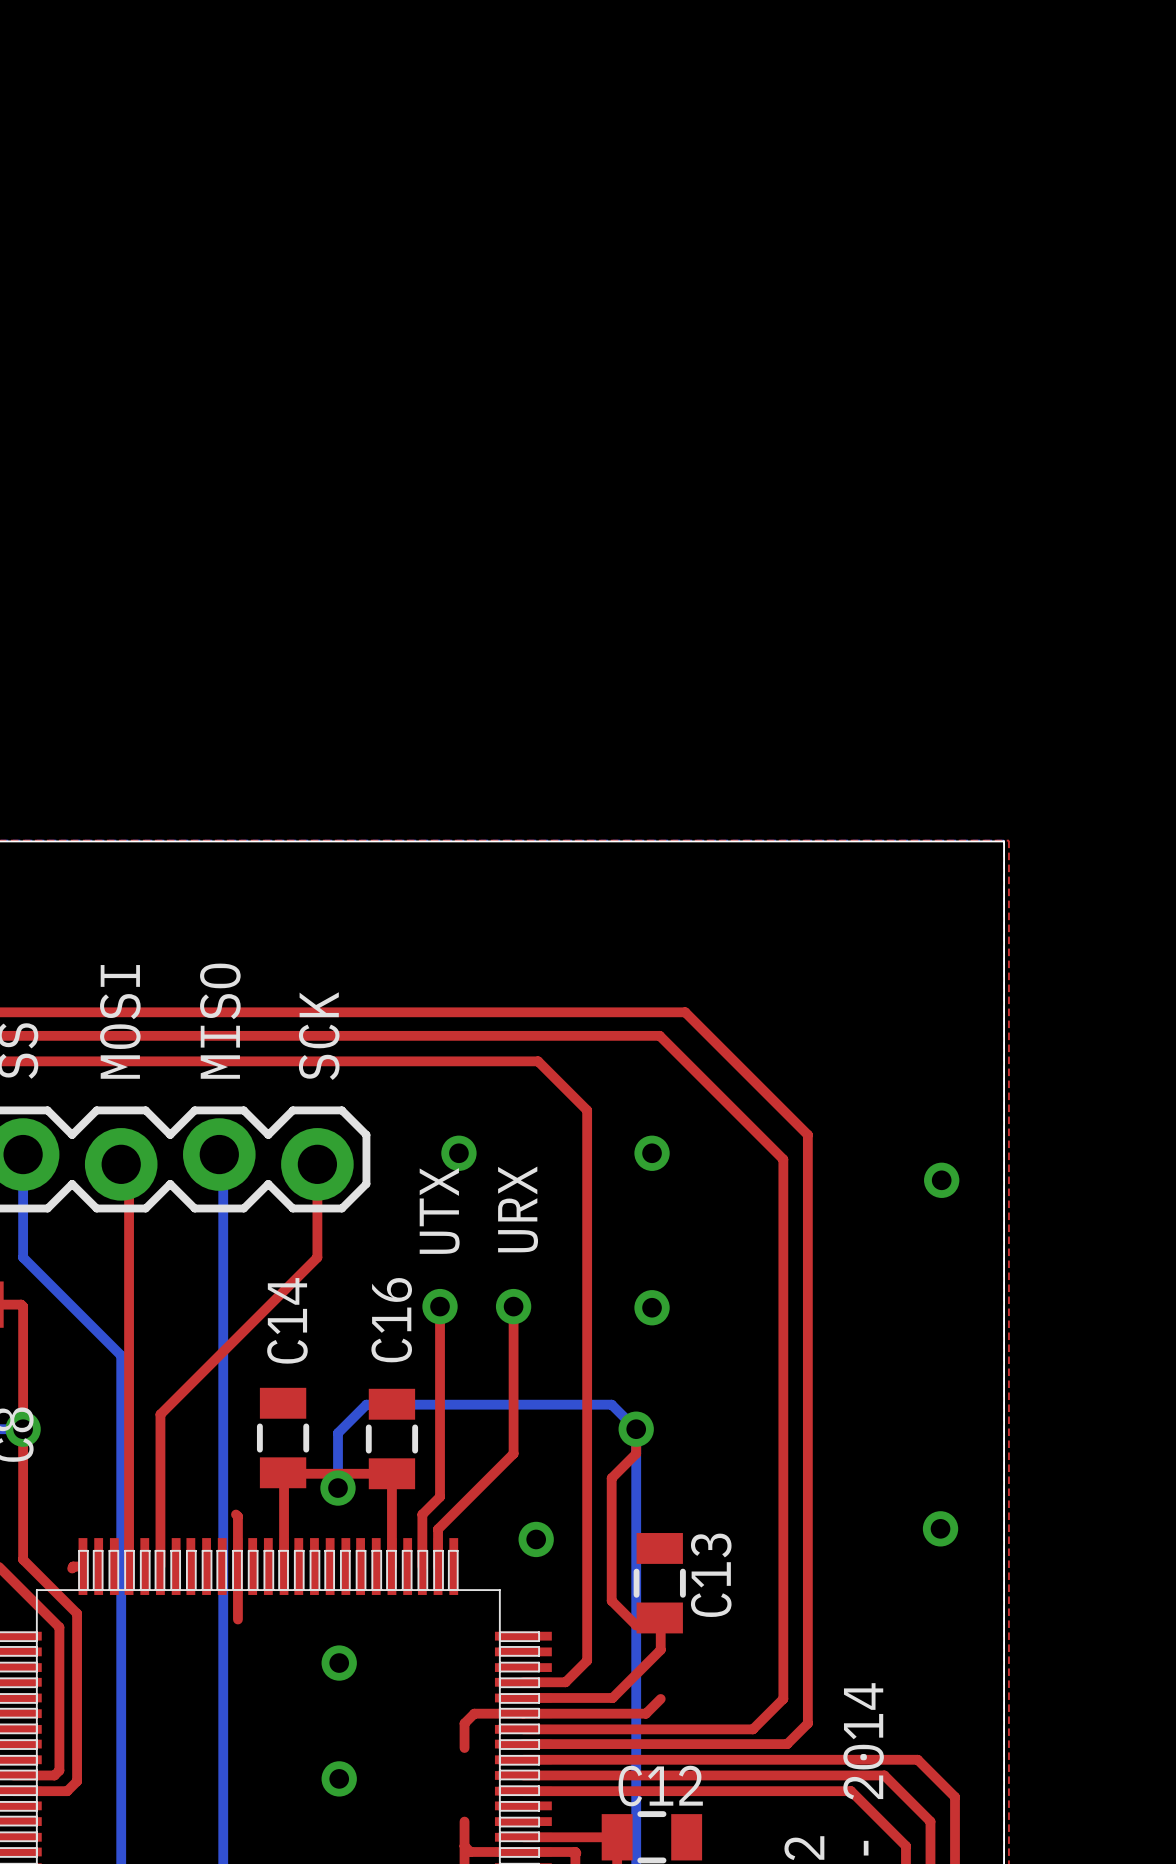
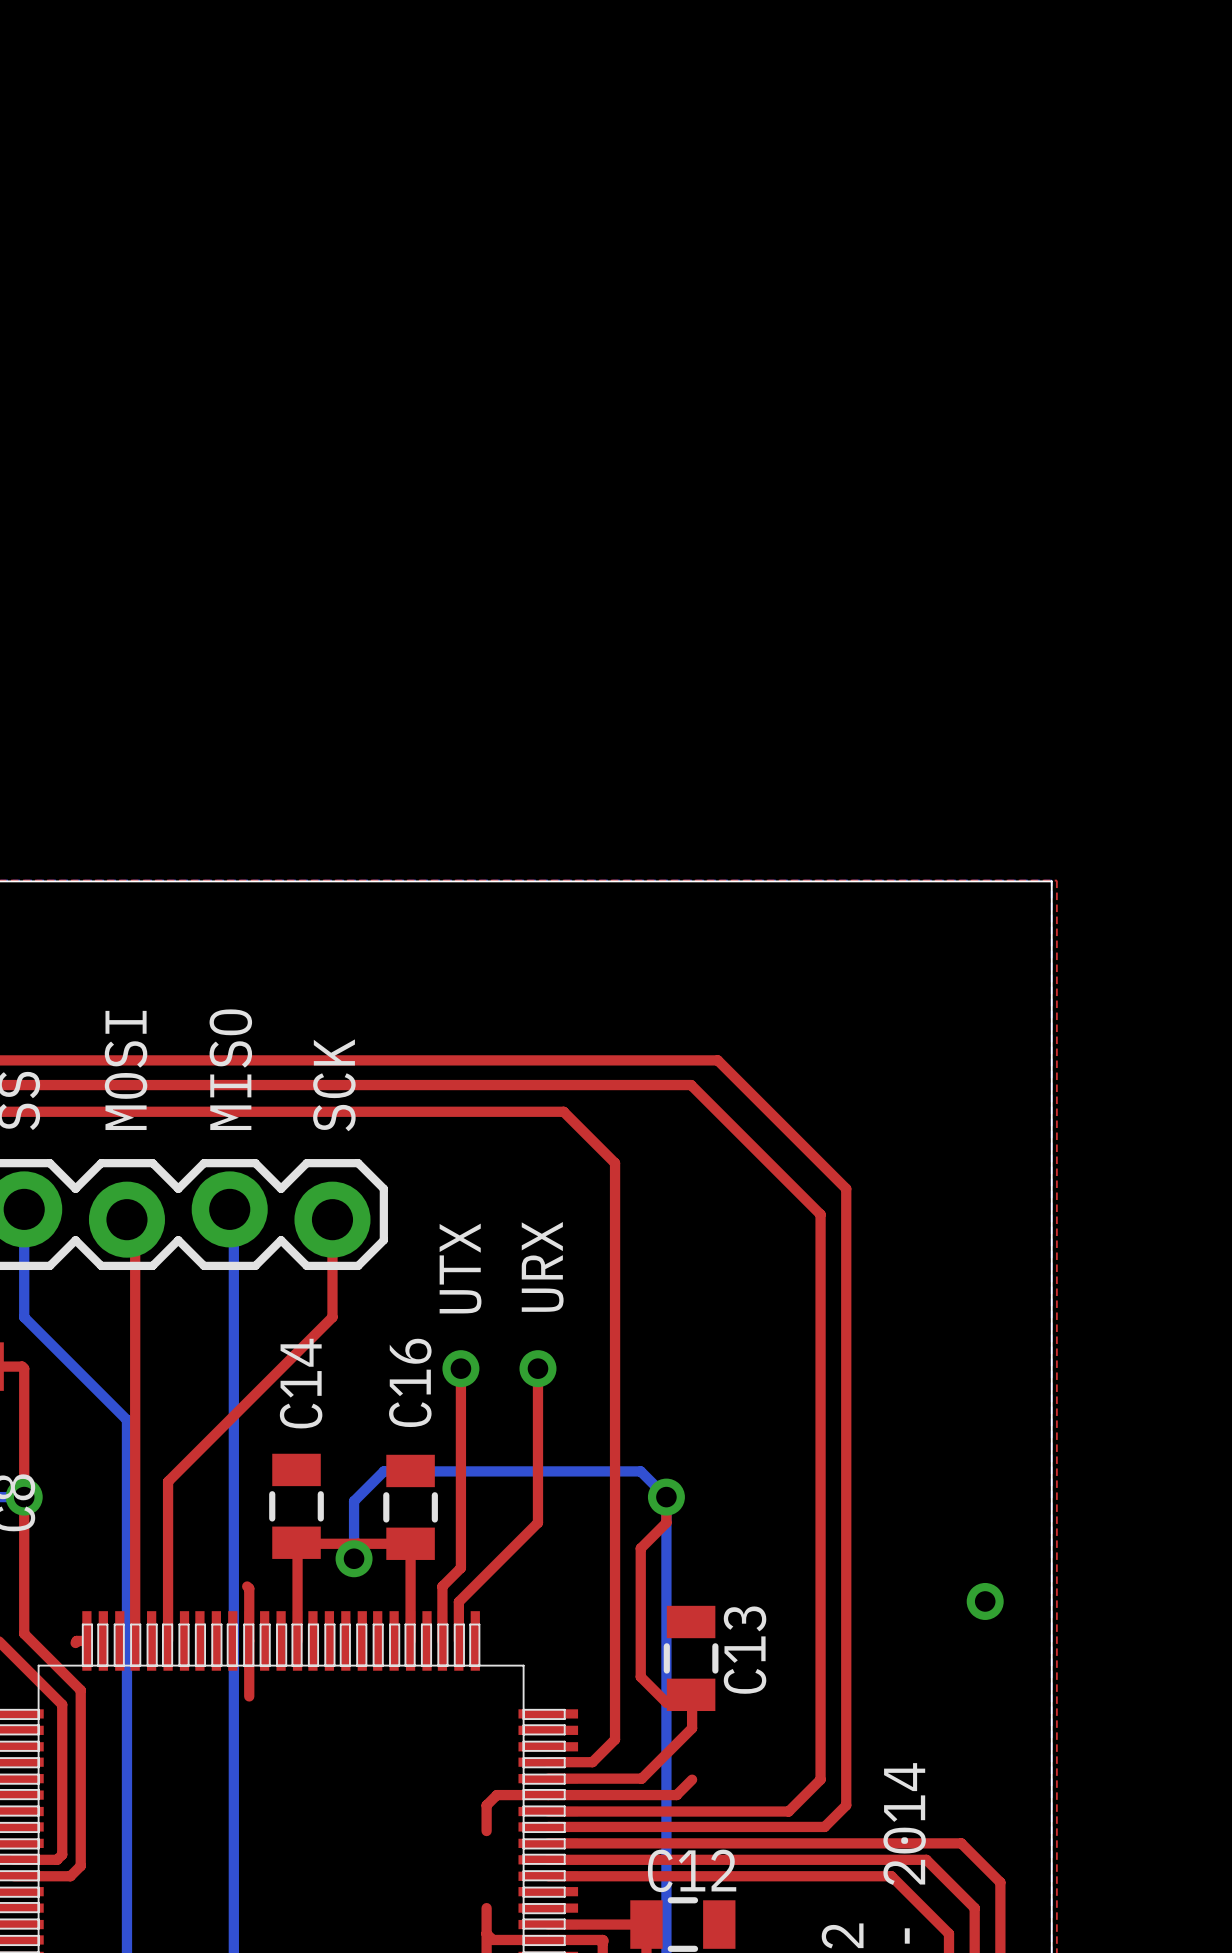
via: (458, 1153) -> none
via: (652, 1153) -> none
via: (941, 1180) -> none
via: (652, 1307) -> none
via: (536, 1539) -> none
via: (339, 1663) -> none
via: (339, 1778) -> none

